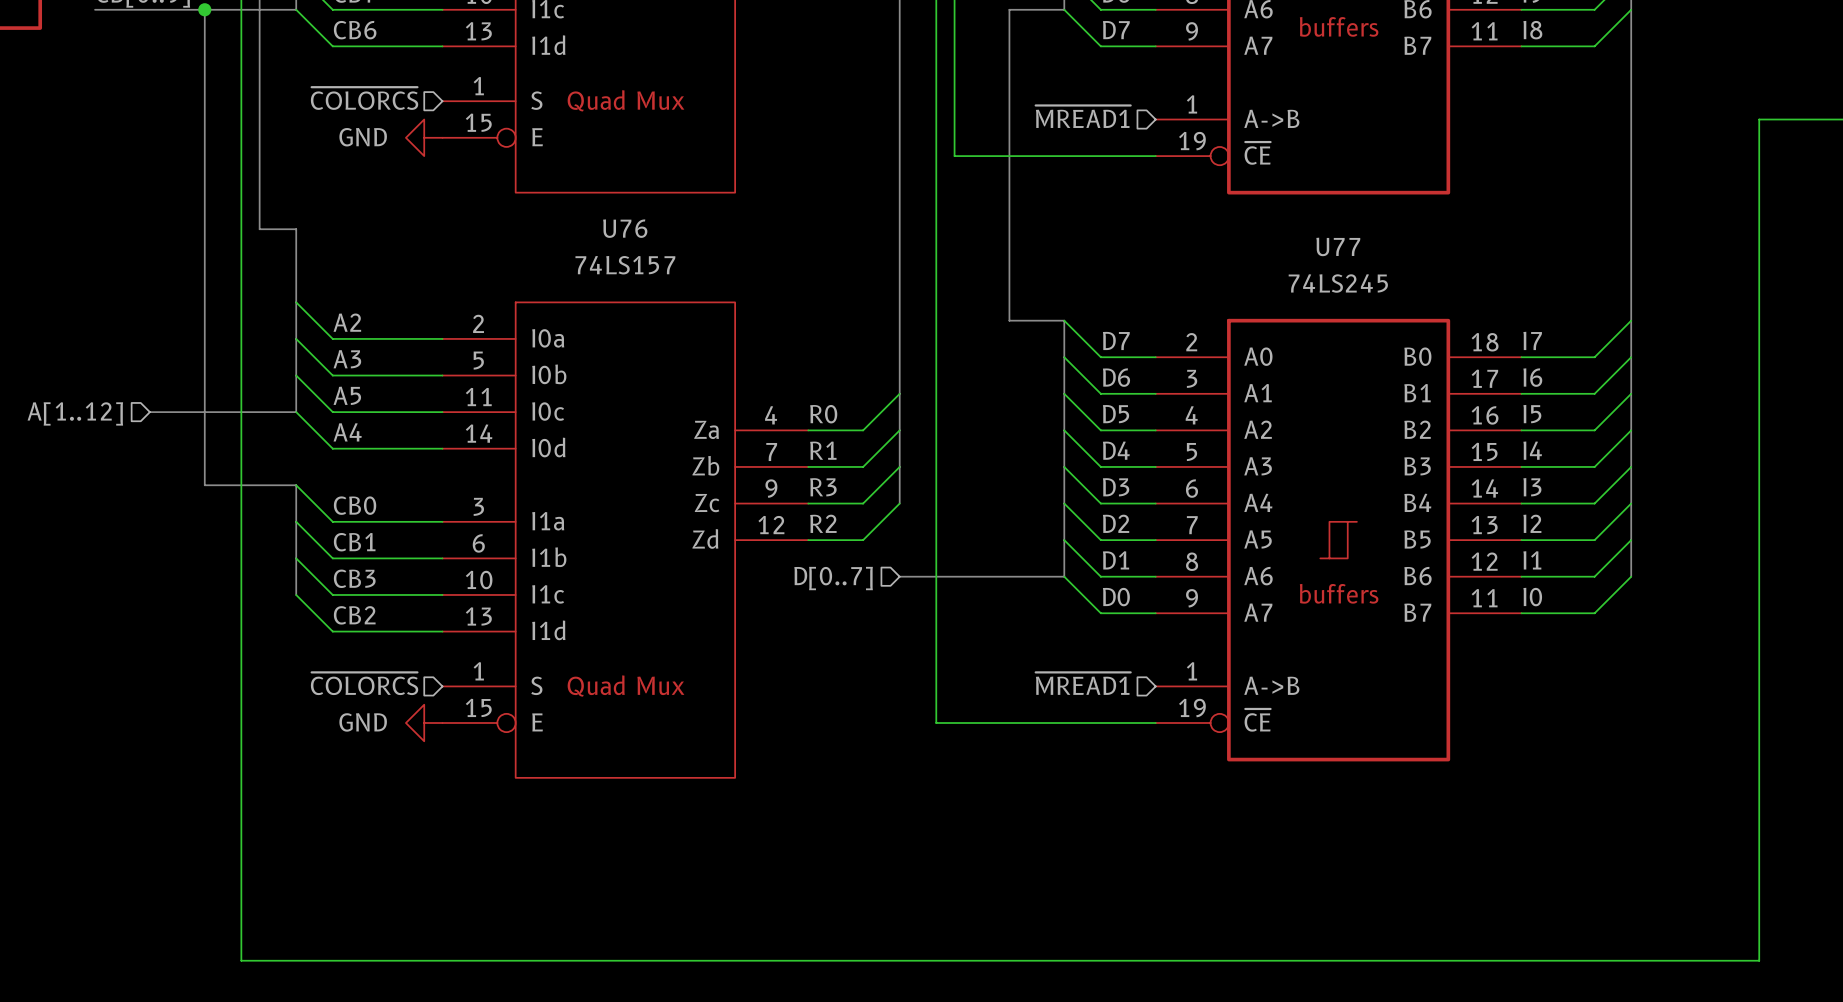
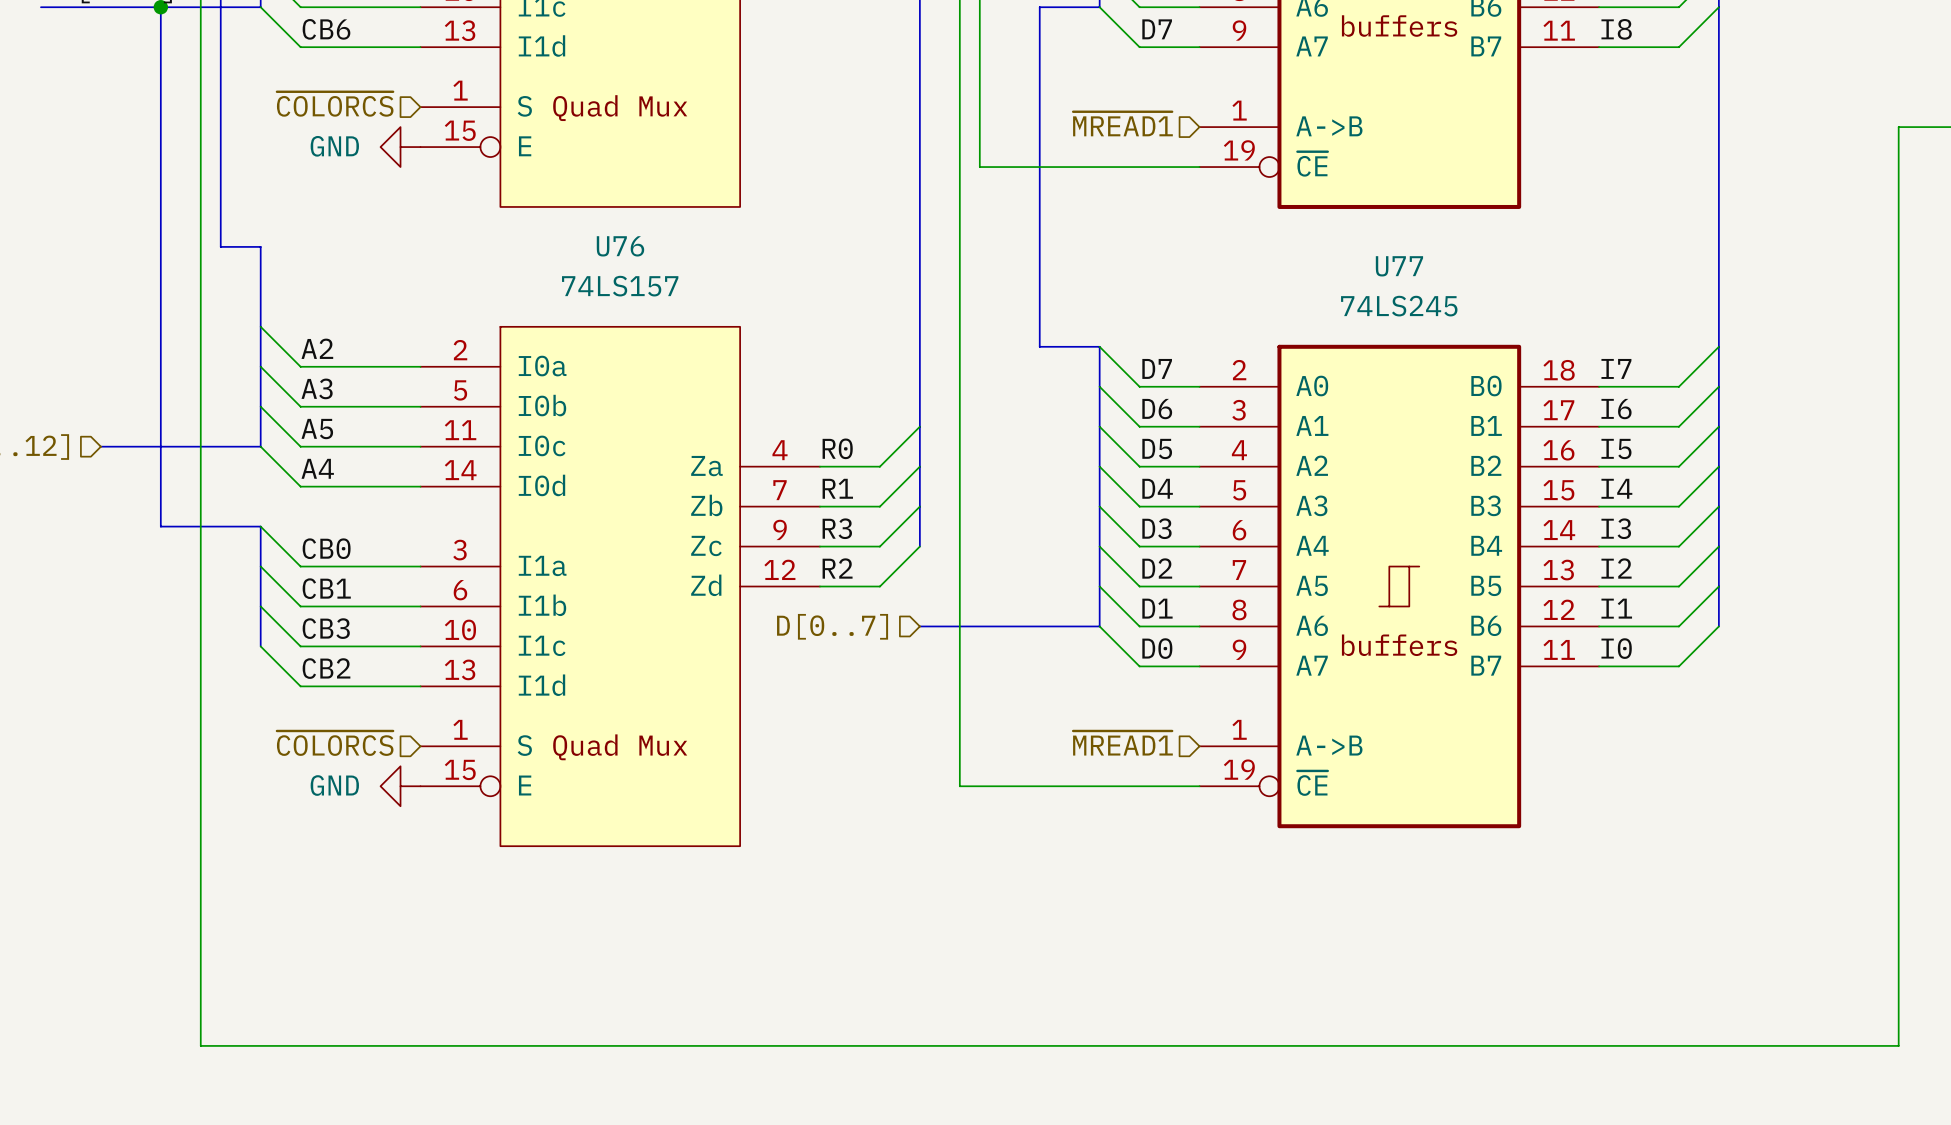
wire: (1795, 119) (1759, 119) (1759, 960) -> (1898, 127) (1898, 1045) (1858, 1045)

